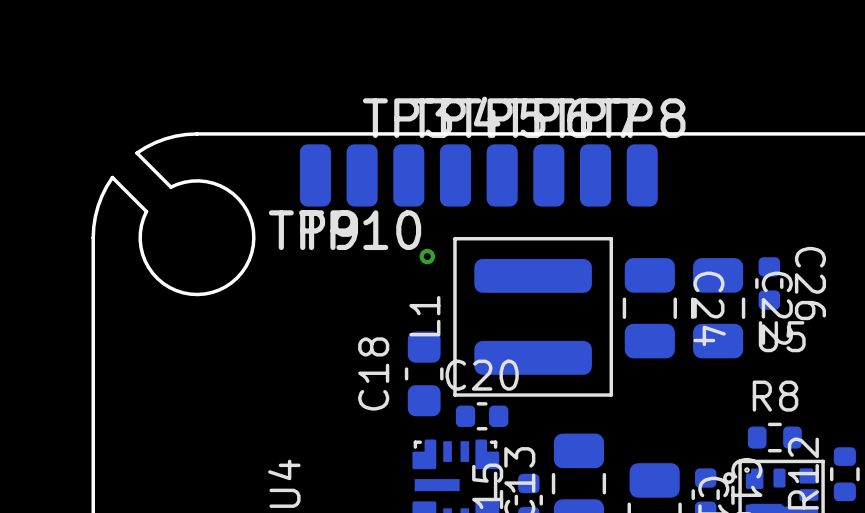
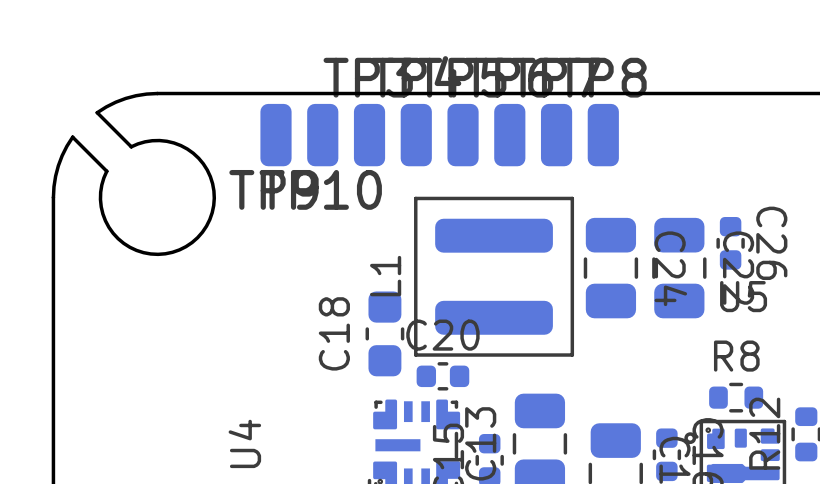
via: (427, 256) -> none

